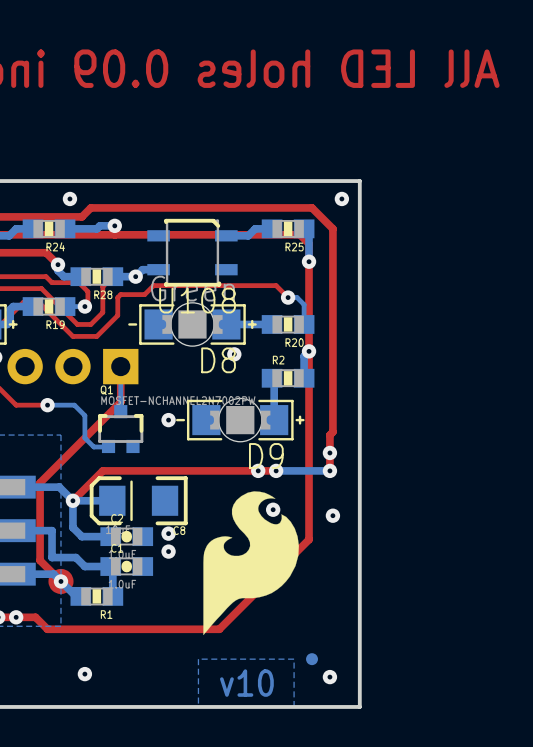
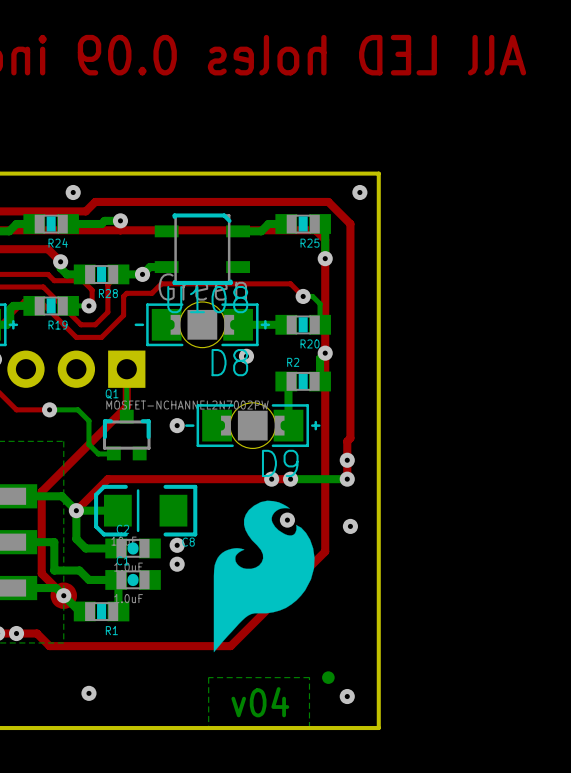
text: v10 (246, 683) -> v04 (260, 702)

